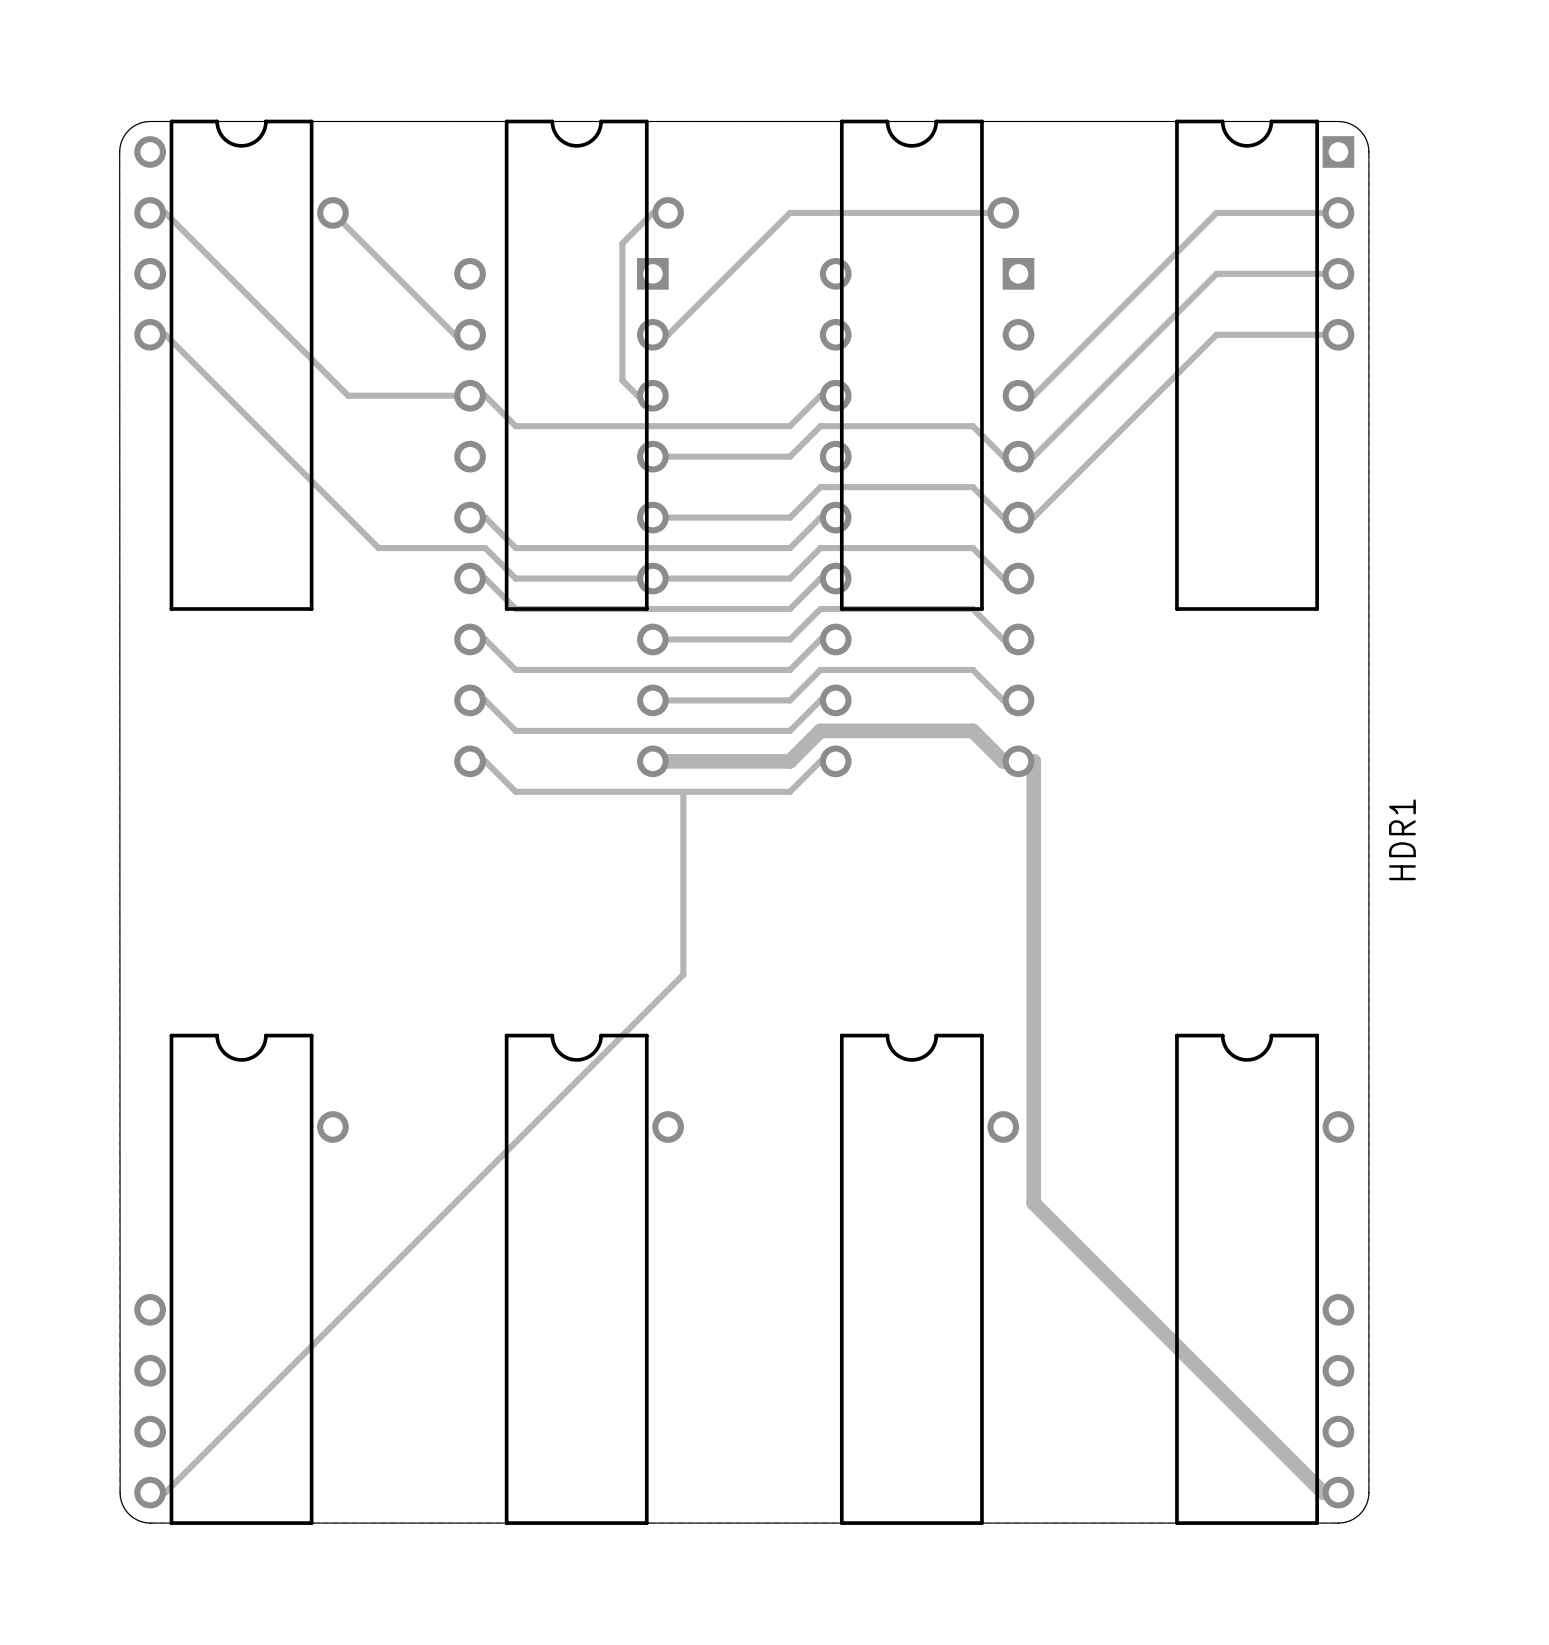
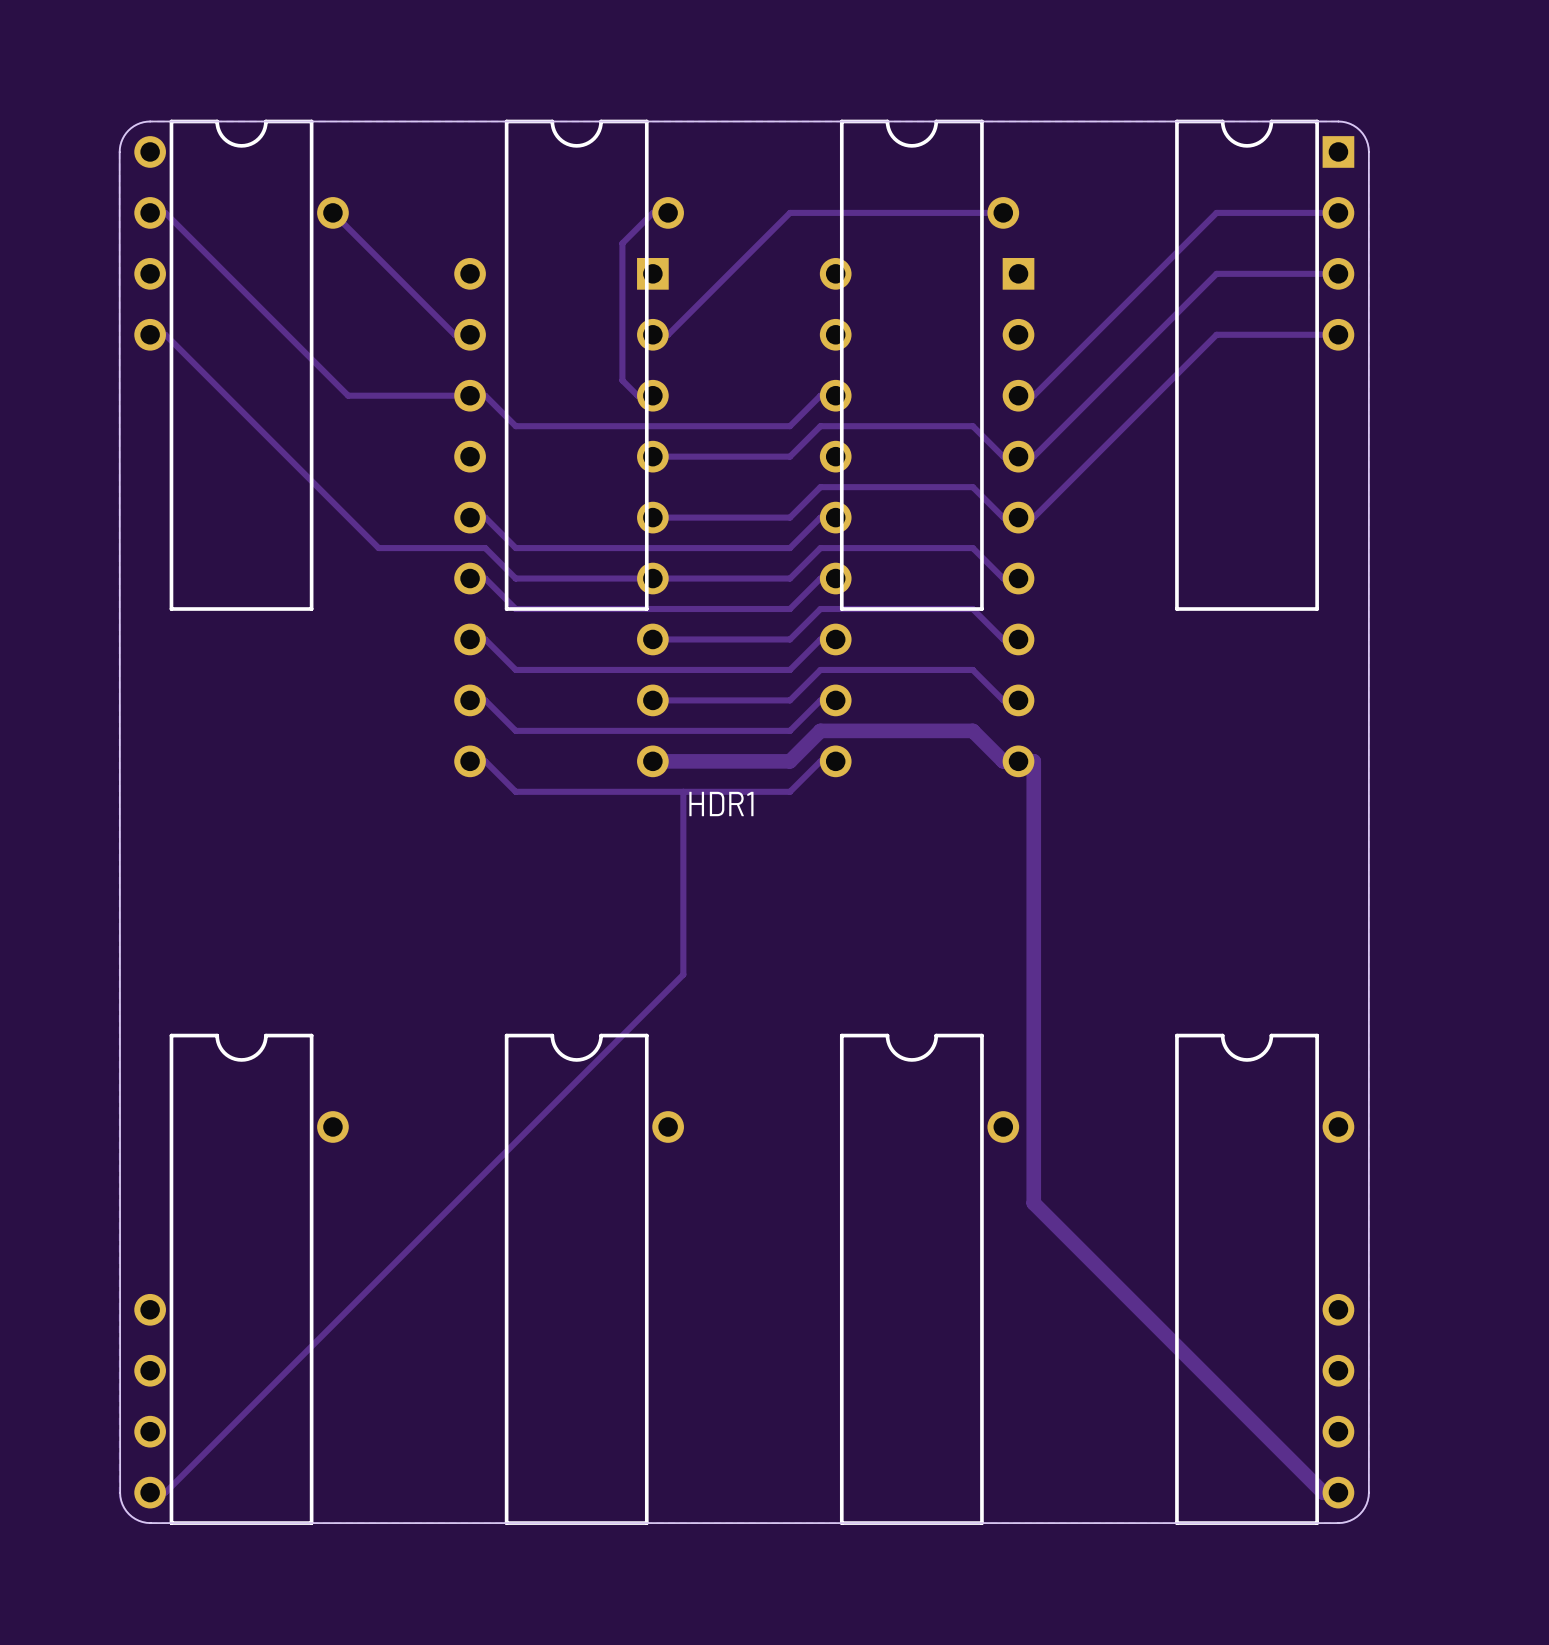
HDR1 name rotation: 0° (1402, 839) -> 90° clockwise (721, 804)
HDR1 name position: HDR1 (1402, 839) -> HDR1 (721, 804)

